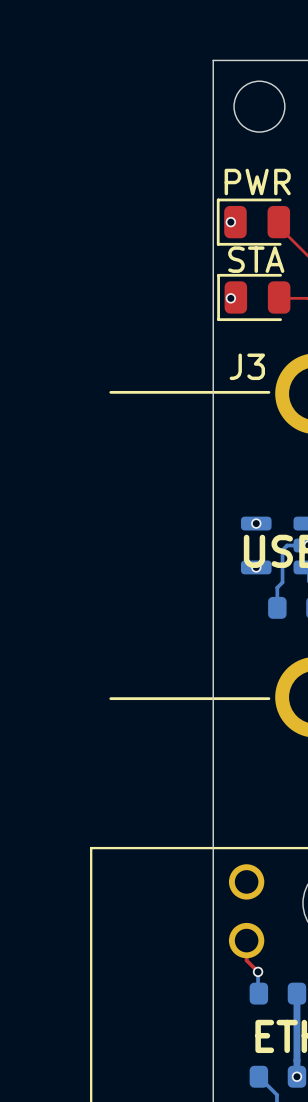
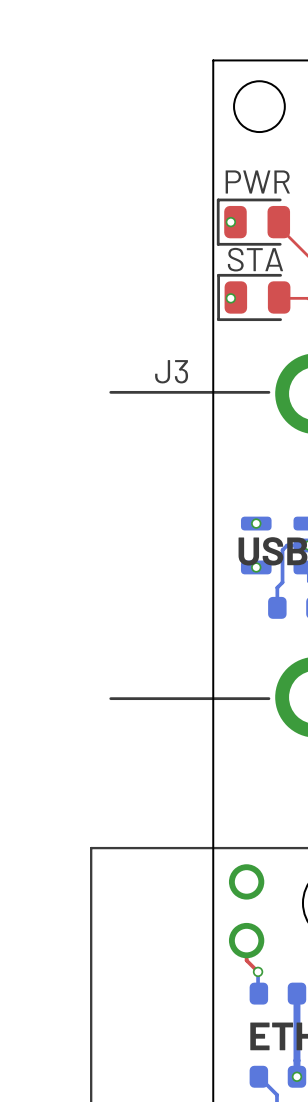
J3 name position: J3 (247, 366) -> J3 (171, 371)

